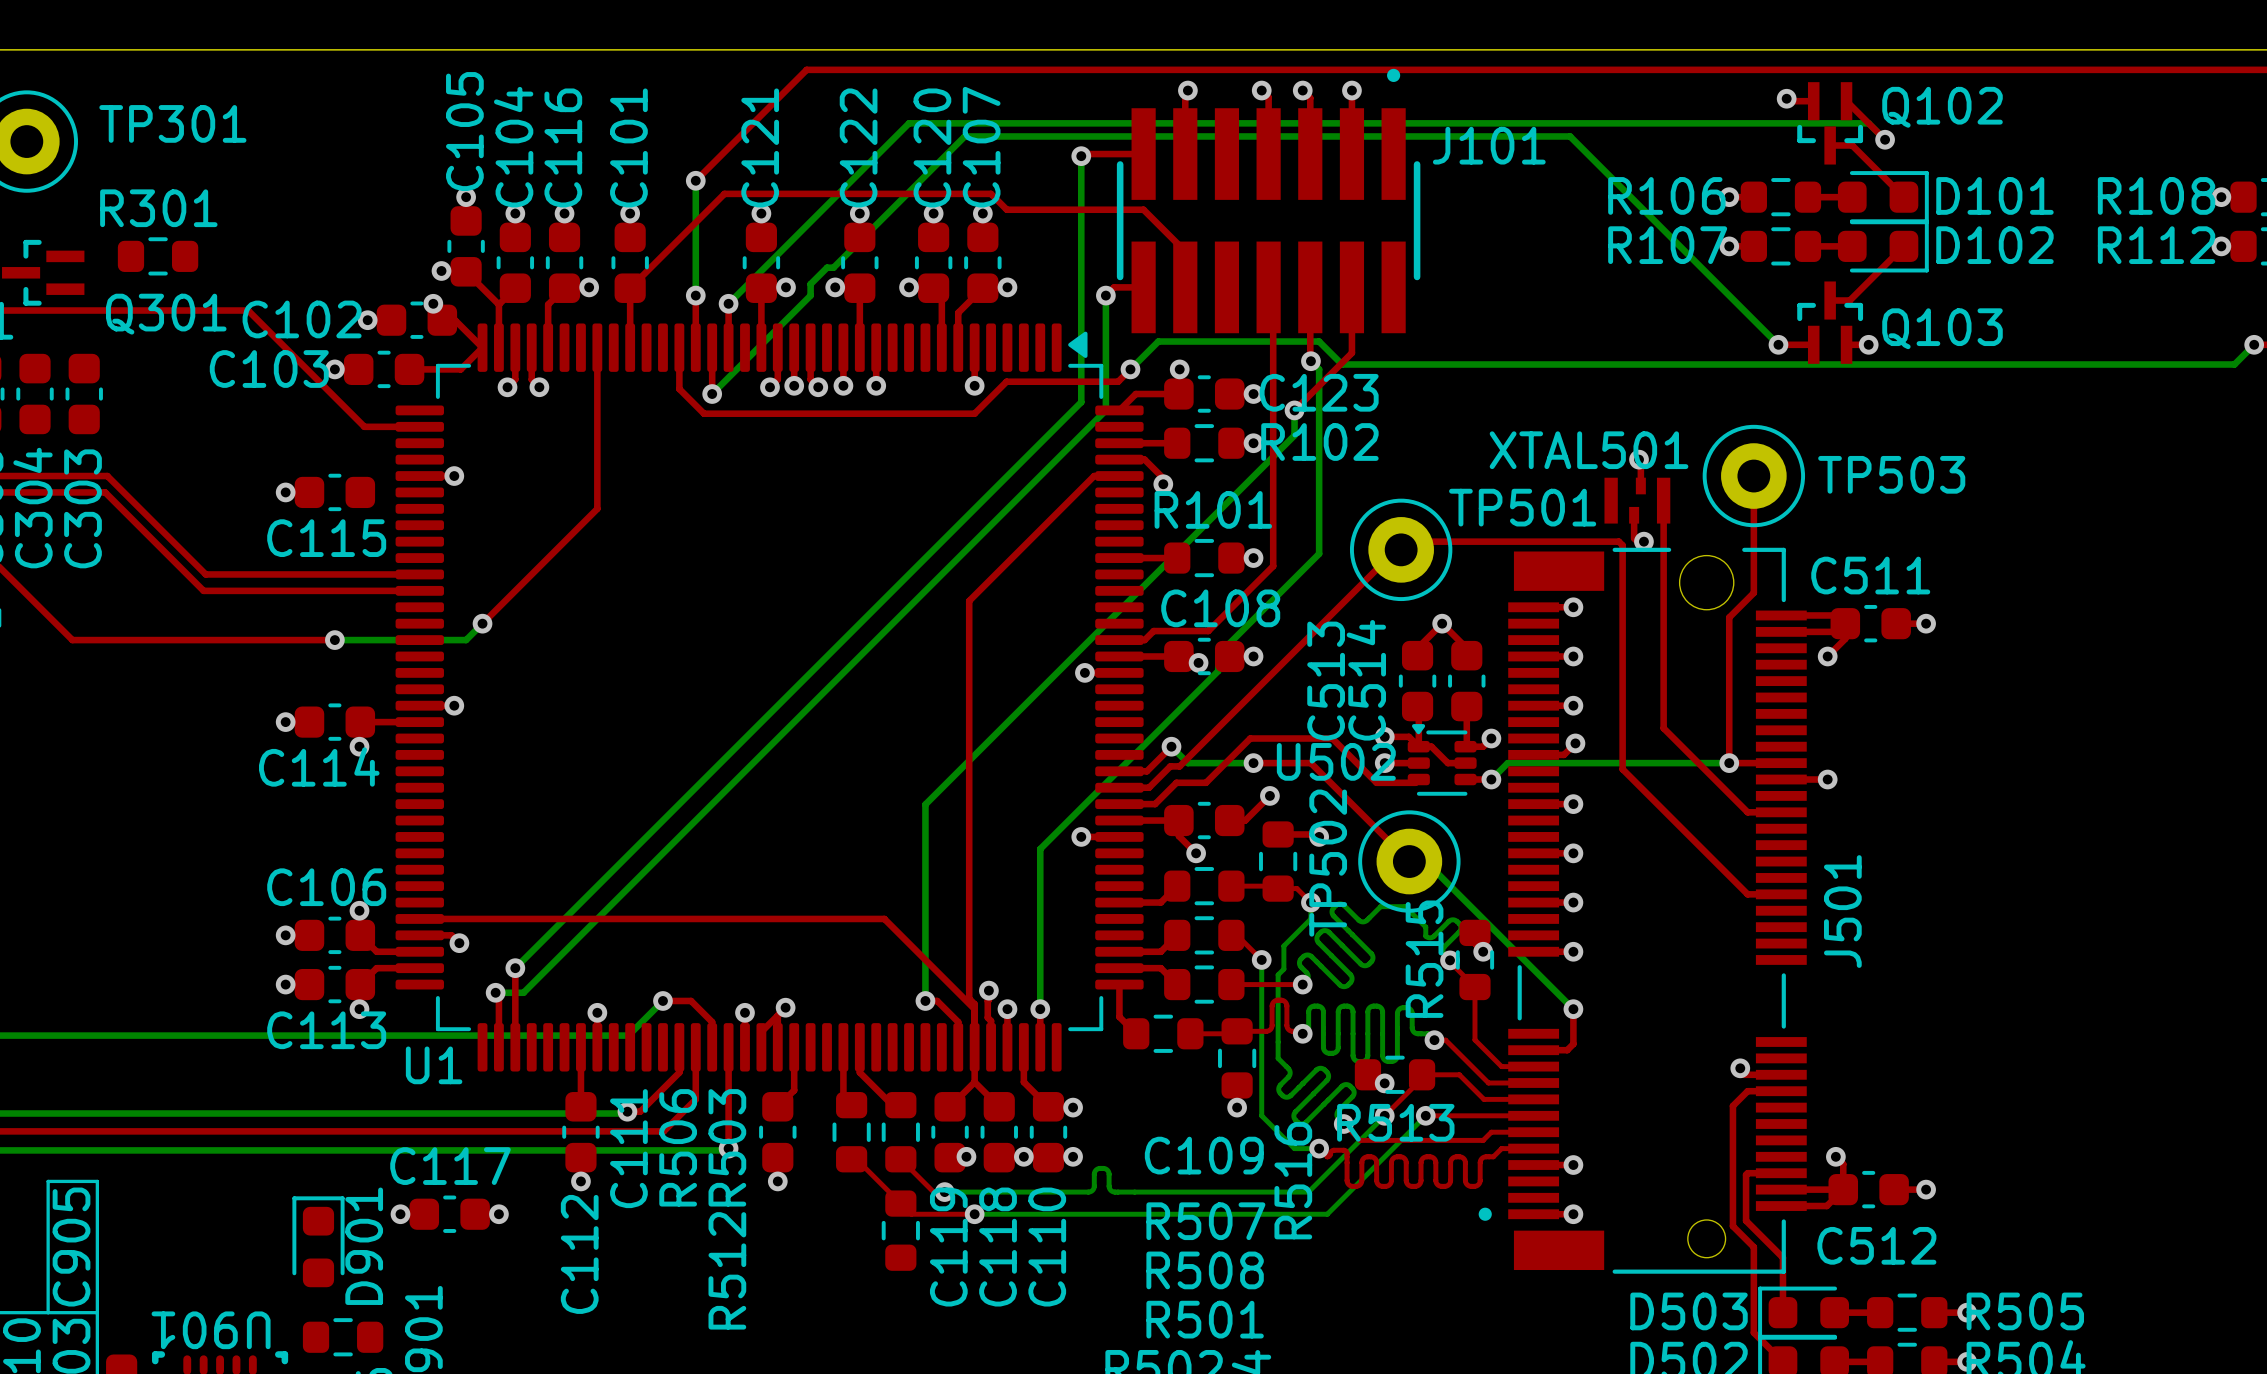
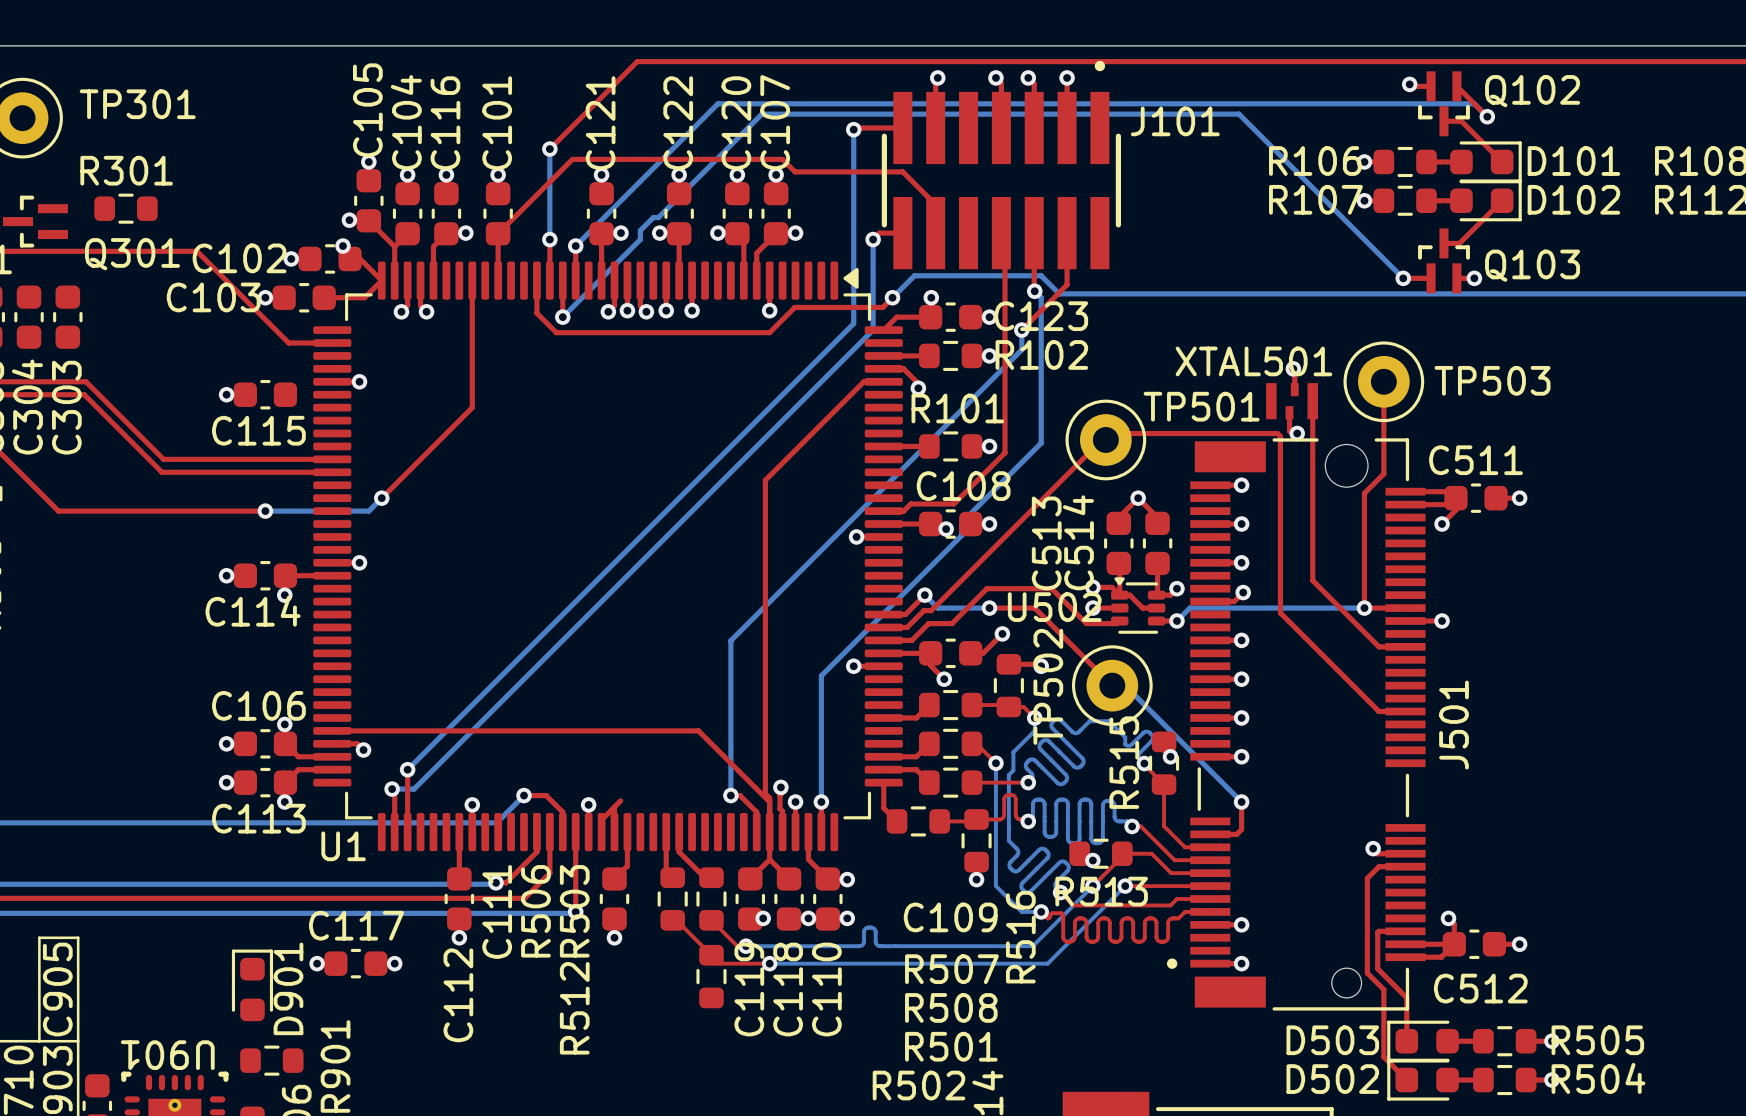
via: (785, 1007) -> none

